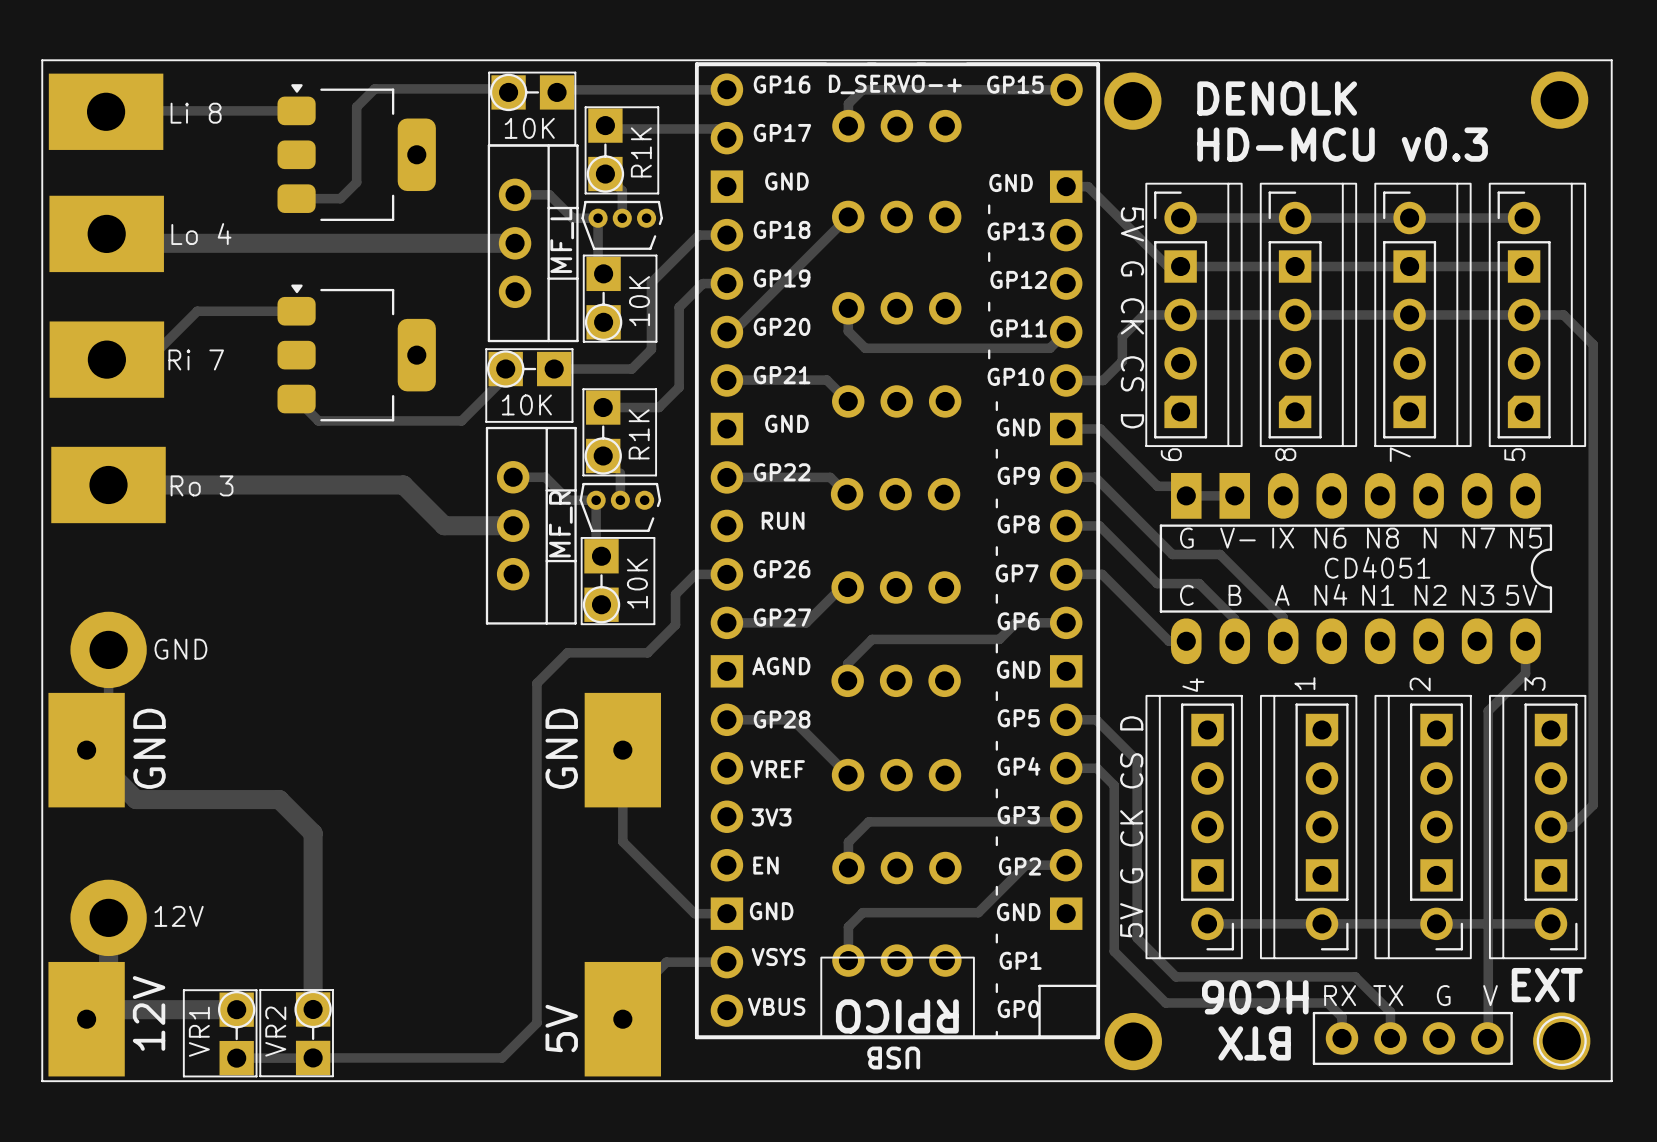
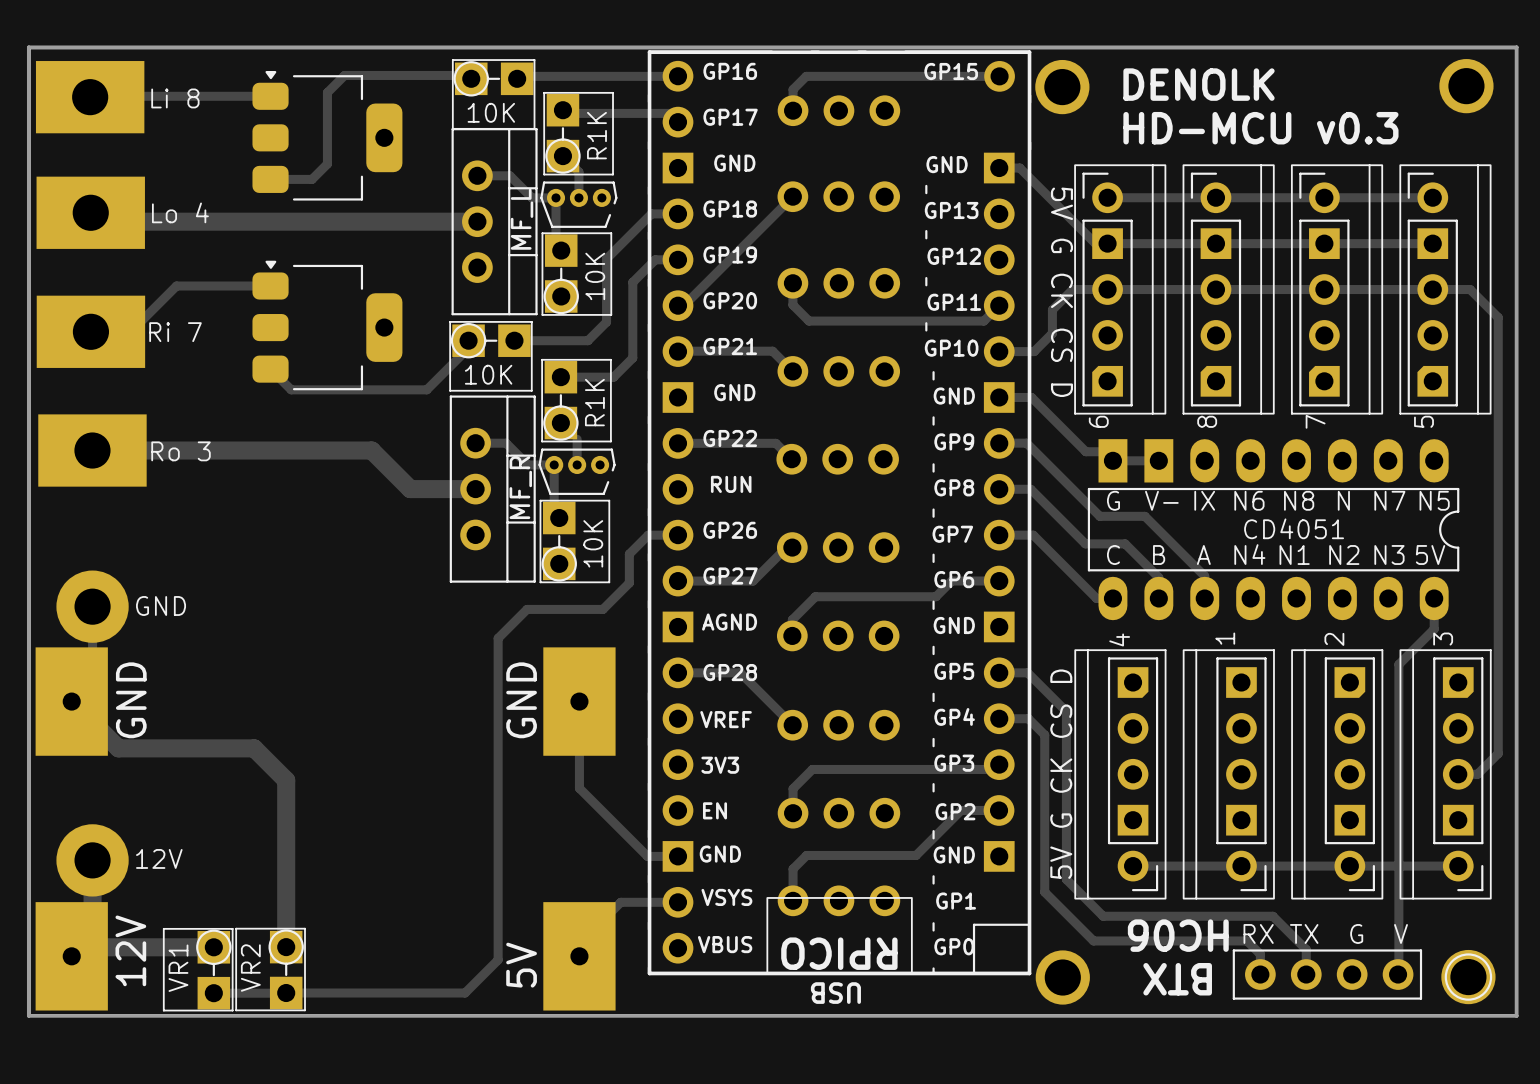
board edge: none -> (28, 47) (1516, 47) (1516, 1015) (28, 1015) (28, 47)
text: D_SERVO-+ (895, 84) -> none
text: EXT (1547, 985) -> none

